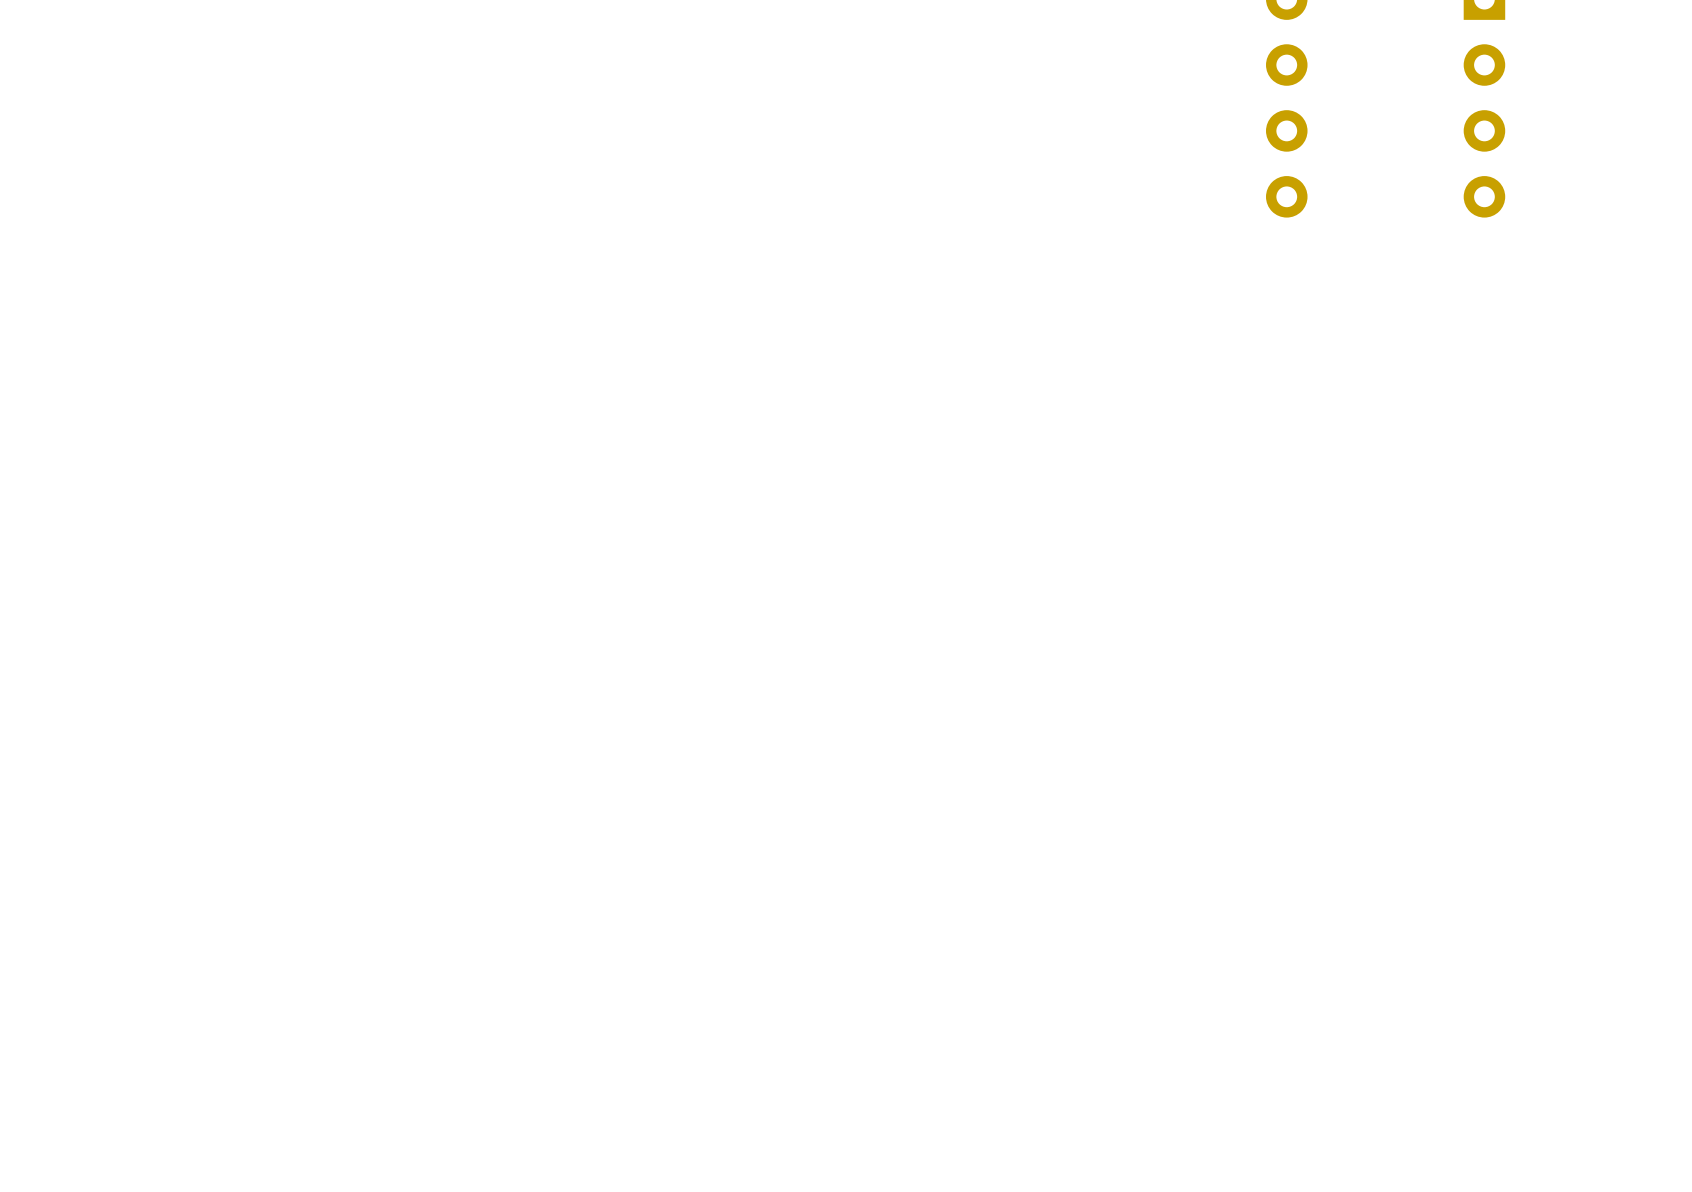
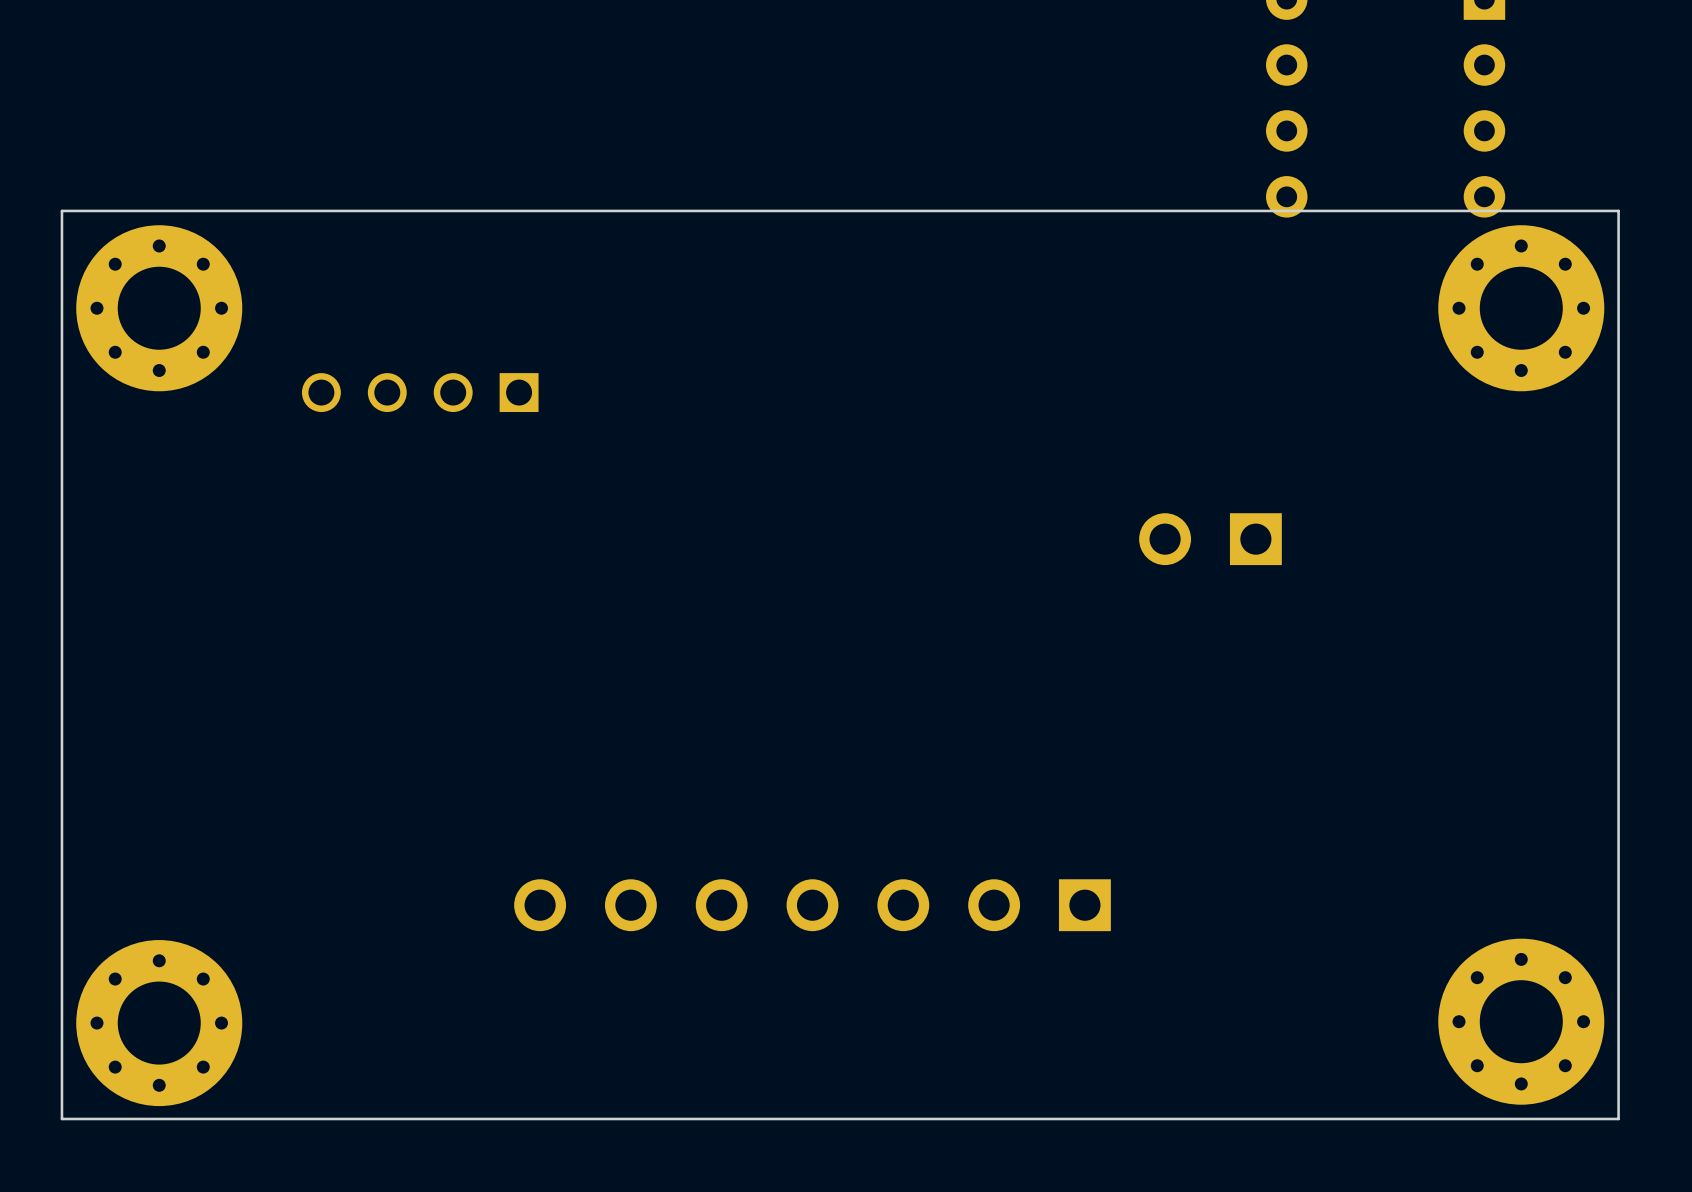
board edge: none -> (1618, 210) (61, 210) (61, 1118) (1618, 1118) (1618, 210)
part: none -> (159, 308)
part: none -> (1521, 308)
part: none -> (420, 392)
part: none -> (1210, 539)
part: none -> (812, 905)
part: none -> (1521, 1021)
part: none -> (159, 1023)

